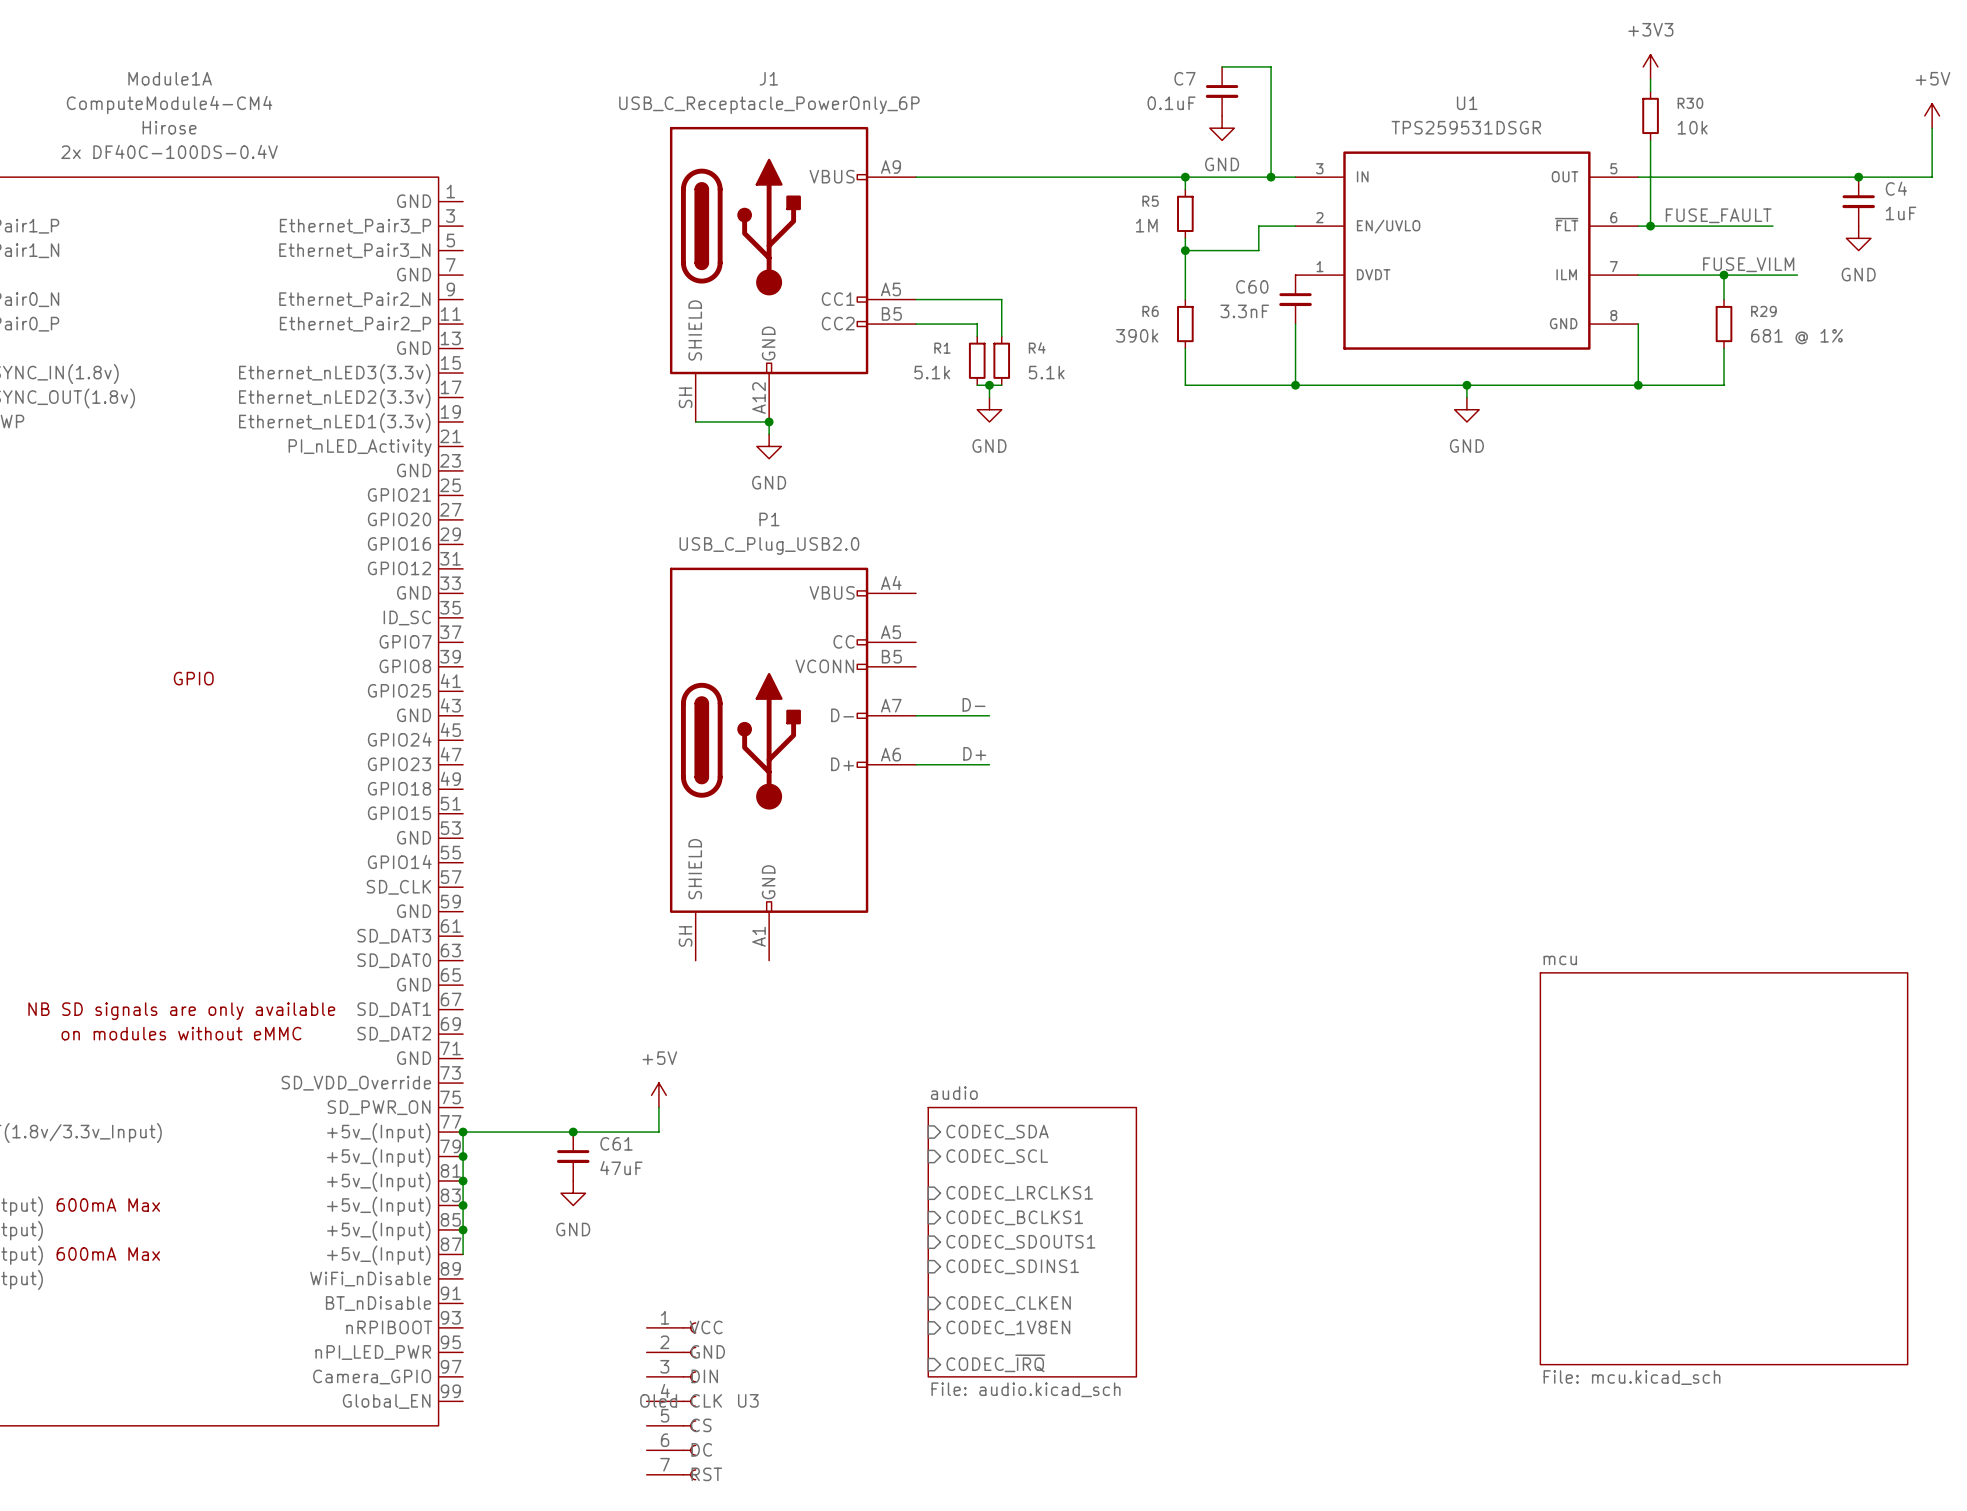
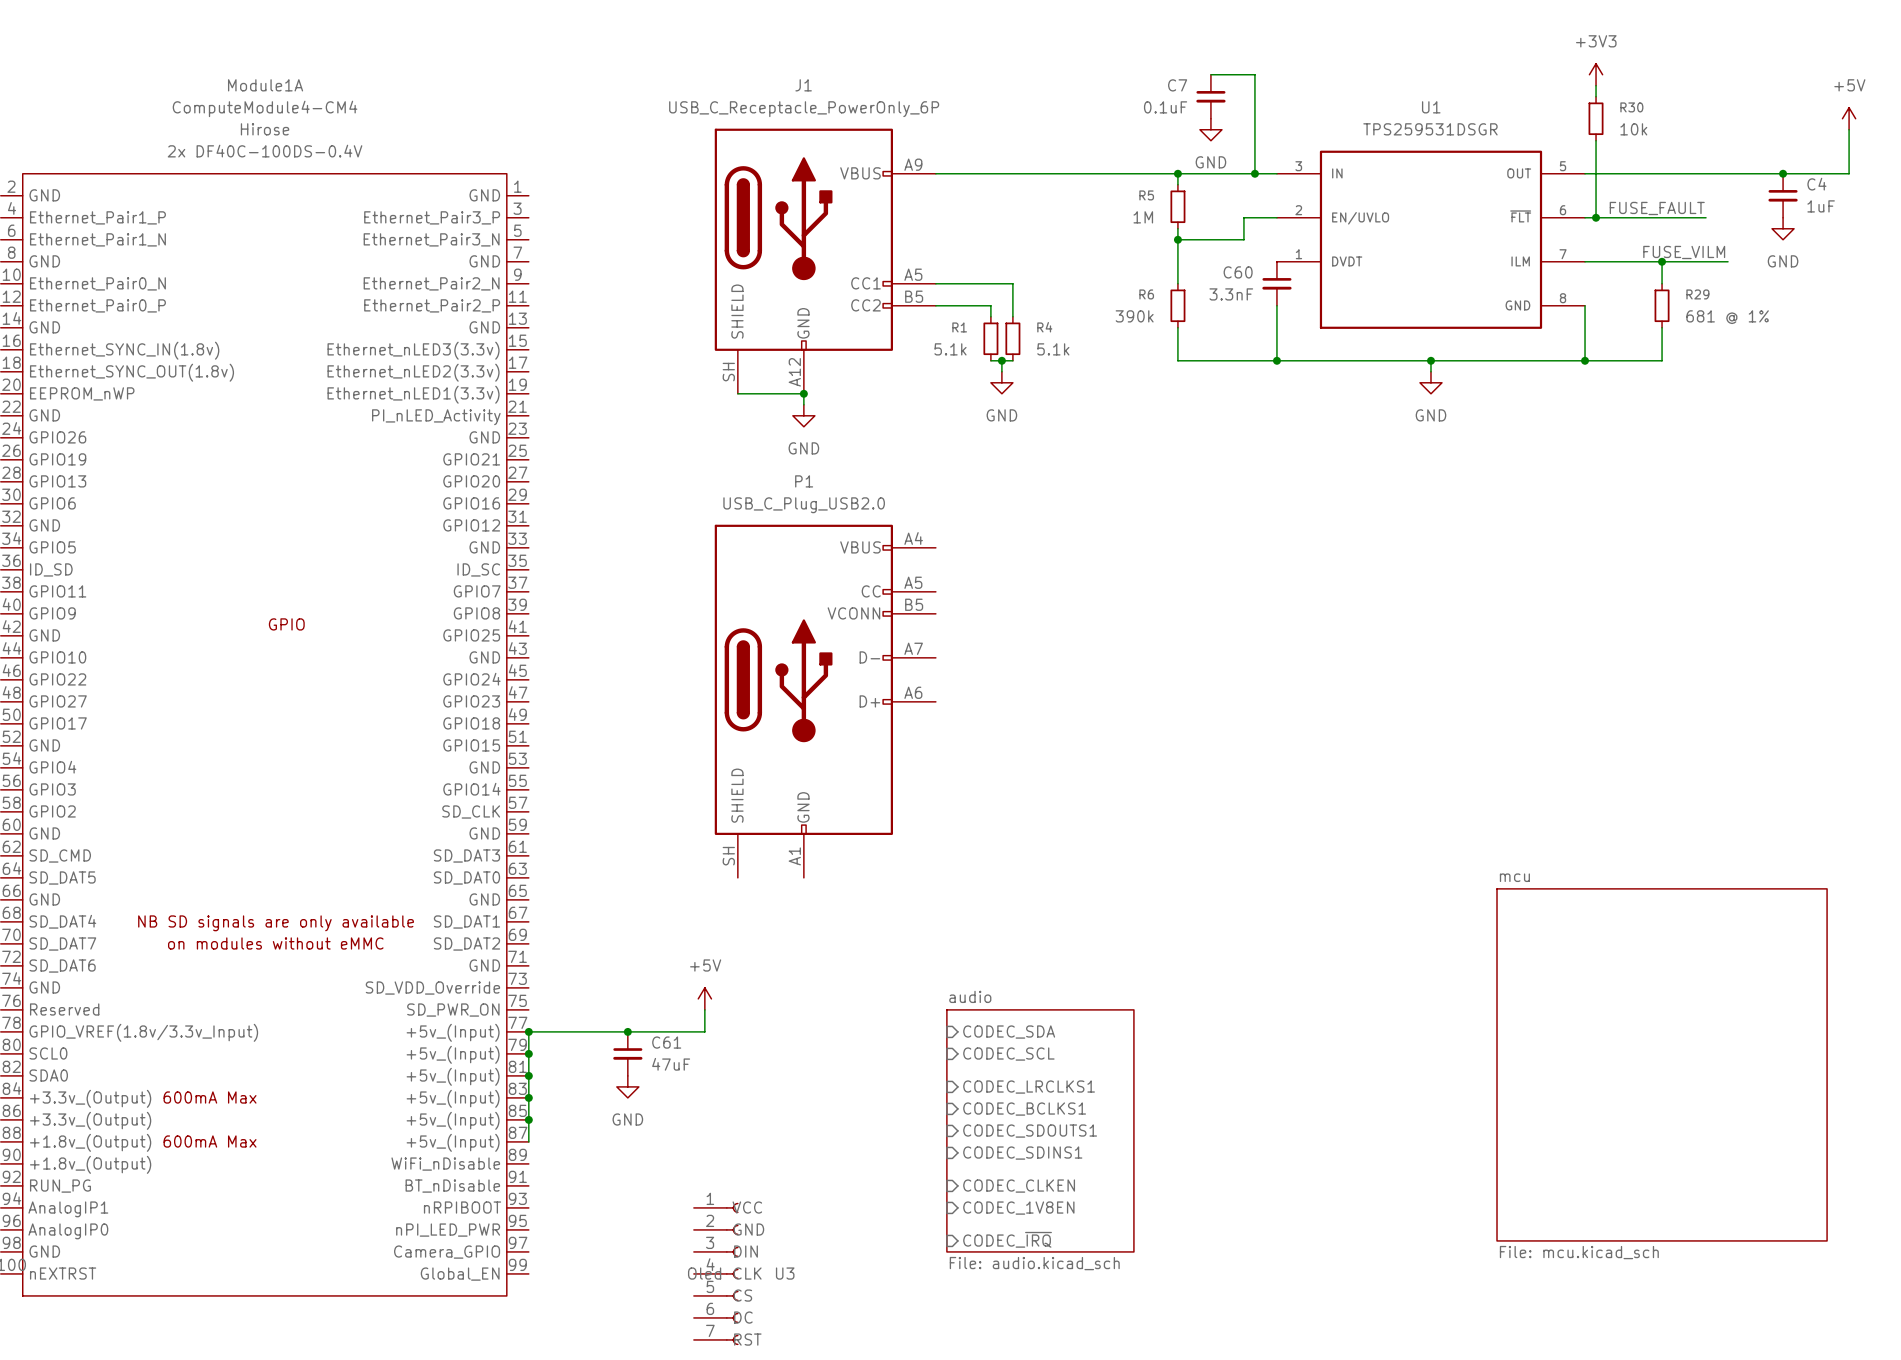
label: D- (974, 704) -> none
wire: (916, 715) (989, 715) -> none
label: D+ (974, 753) -> none
wire: (916, 764) (989, 764) -> none

